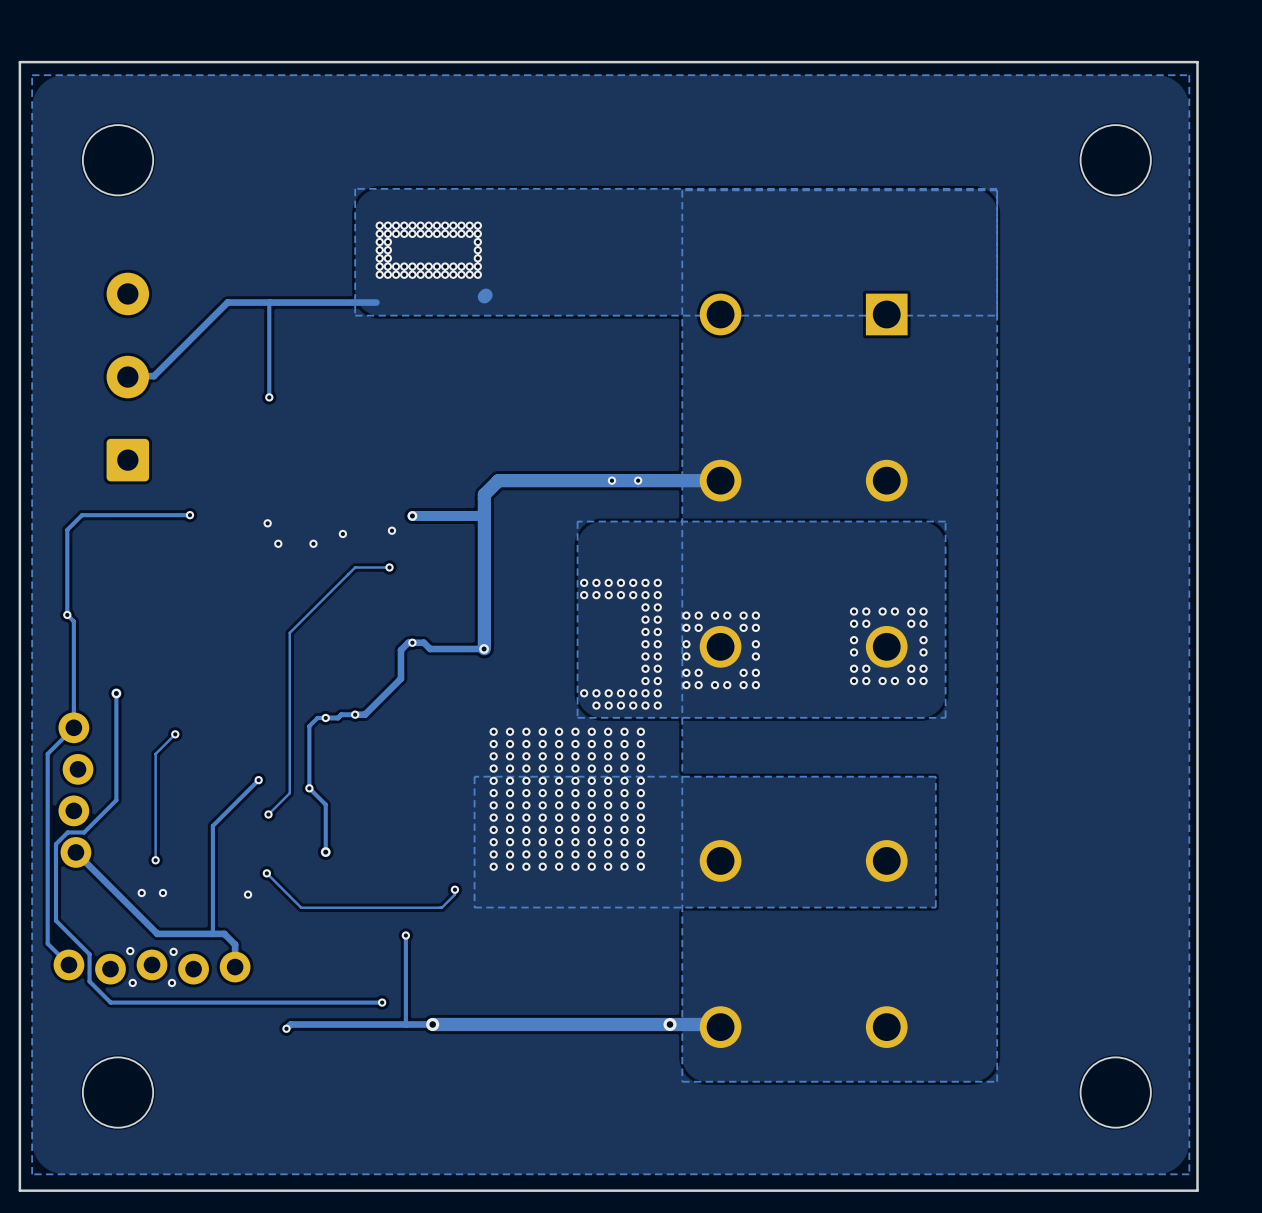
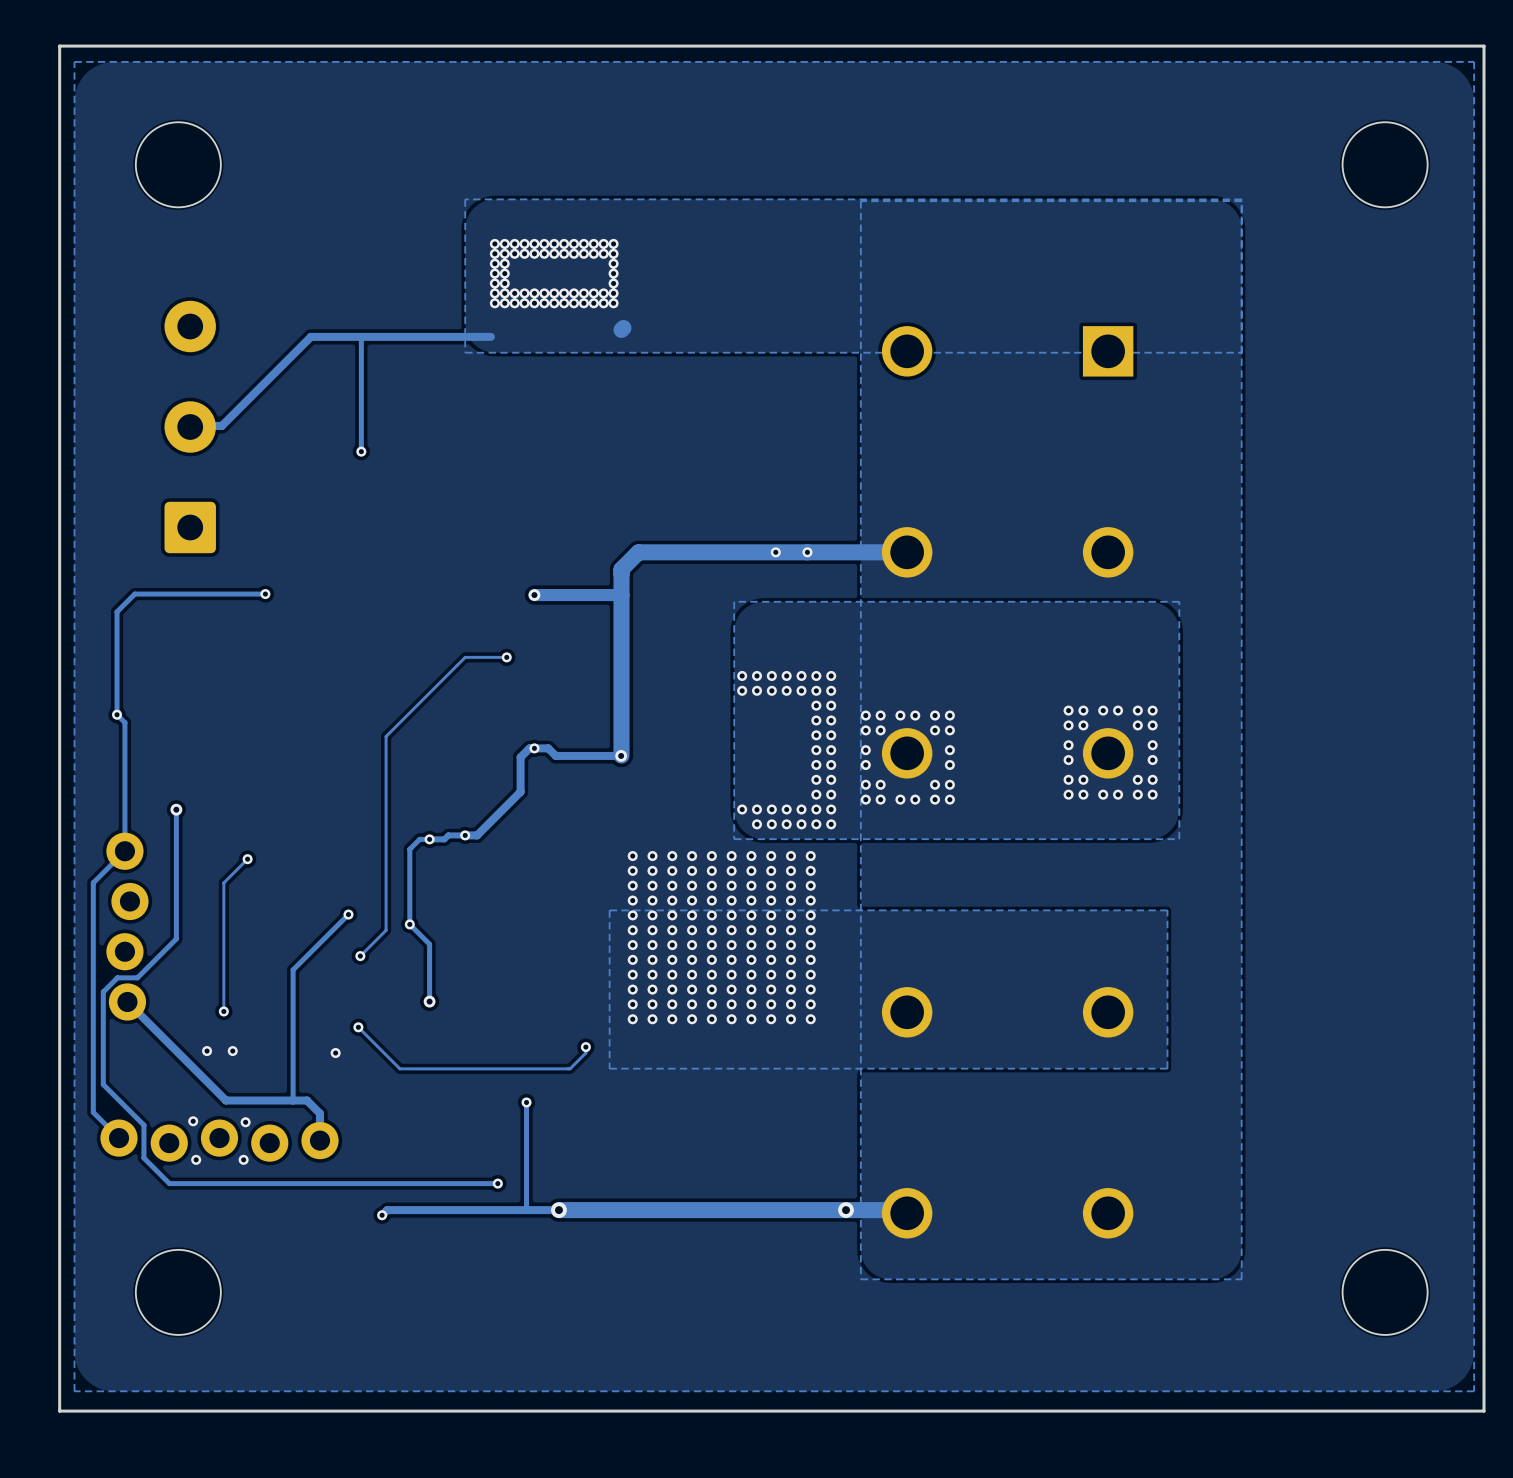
via: (267, 523) -> none
via: (391, 530) -> none
via: (342, 533) -> none
via: (278, 543) -> none
via: (313, 543) -> none

